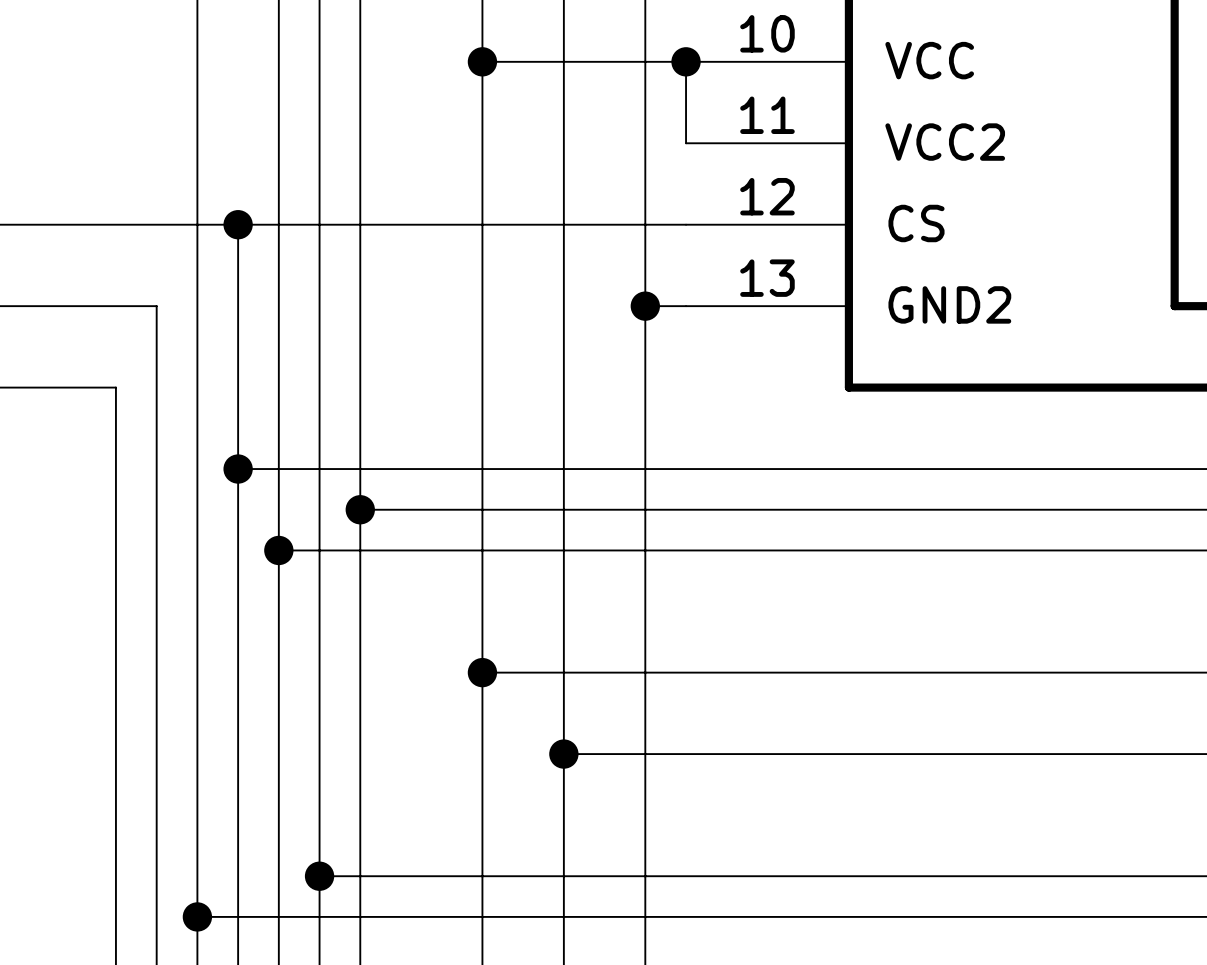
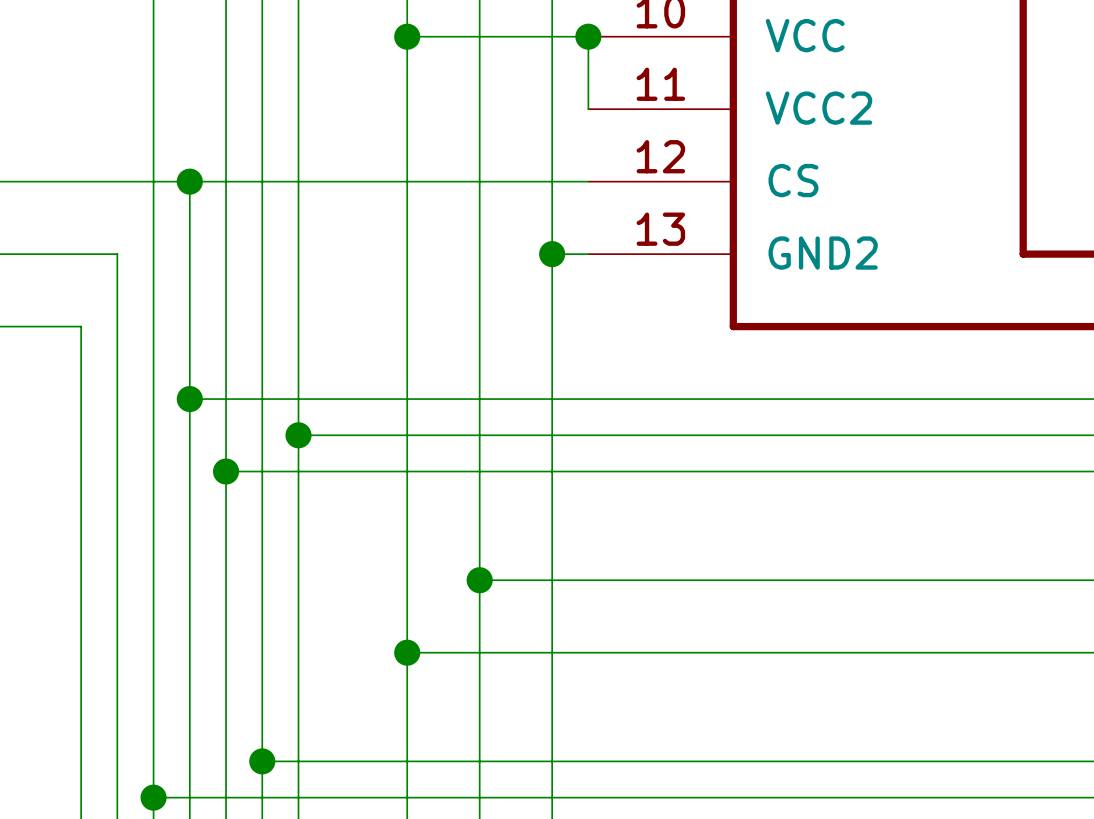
wire: (482, 672) (563, 672) -> (407, 652) (479, 652)
junction: (482, 672) -> none
junction: none -> (479, 580)
junction: none -> (407, 652)
junction: (563, 754) -> none

